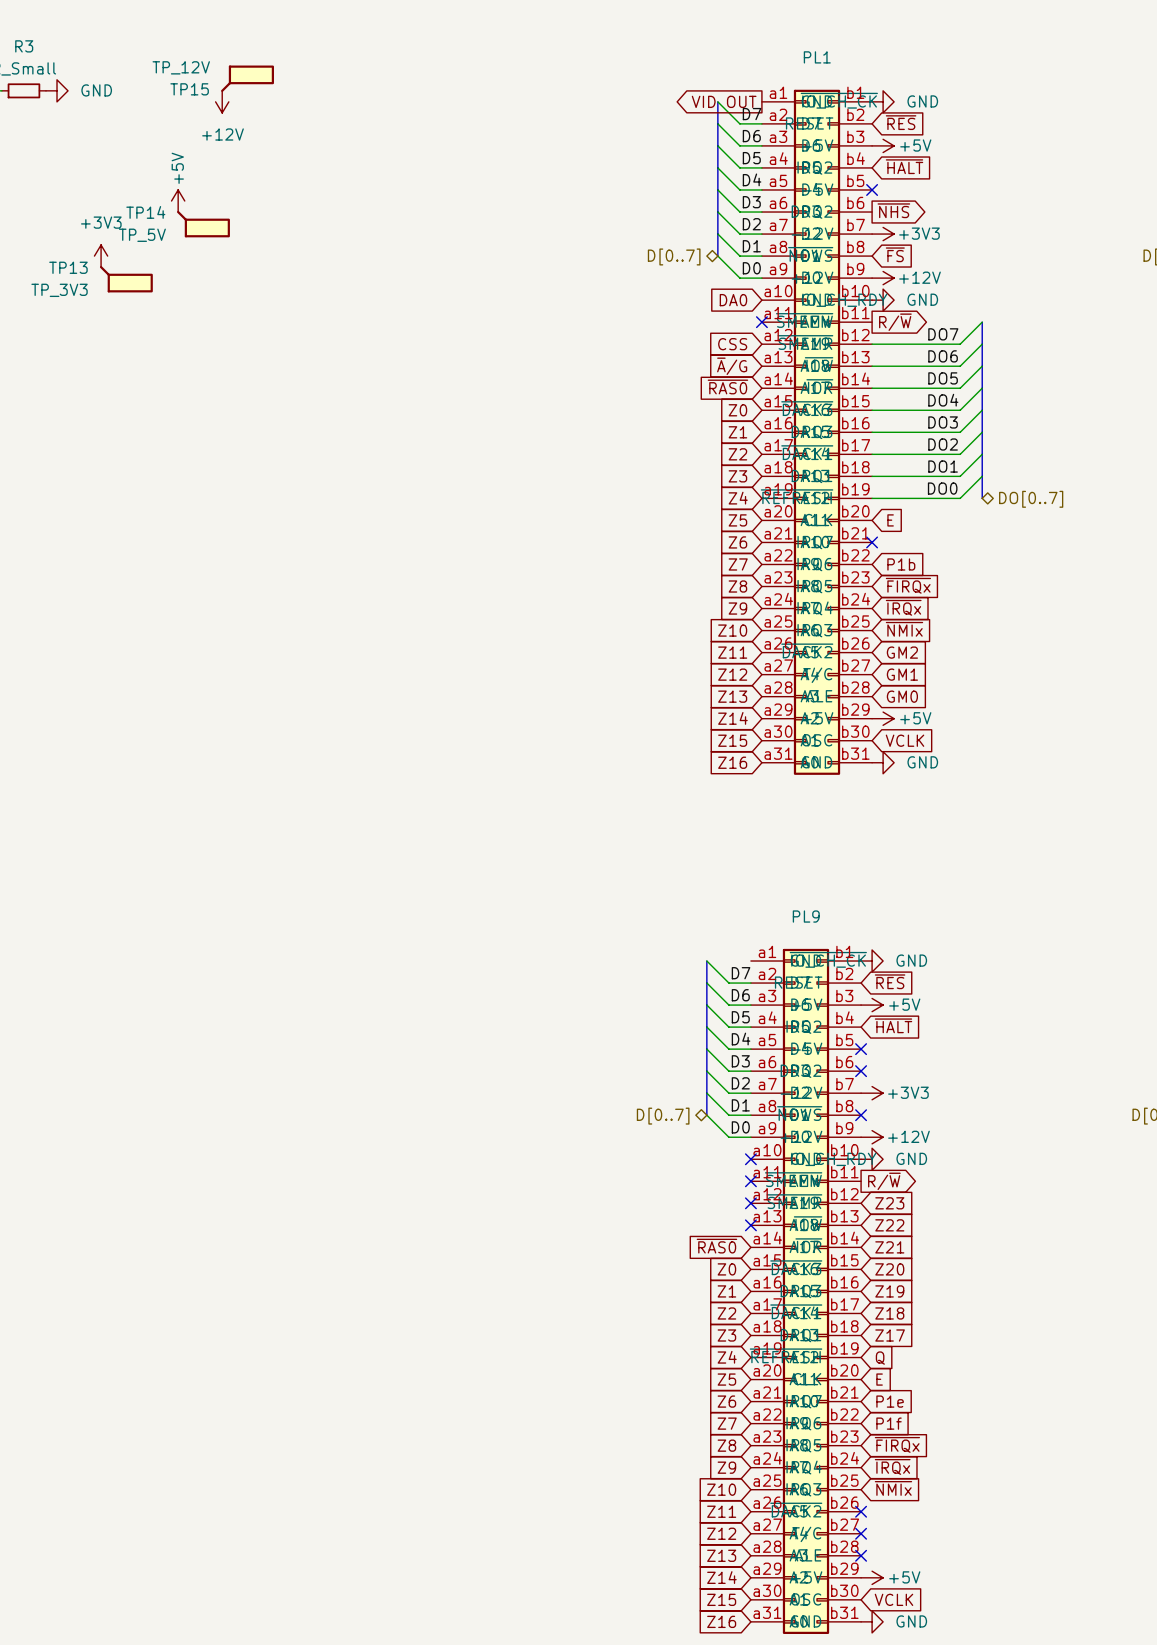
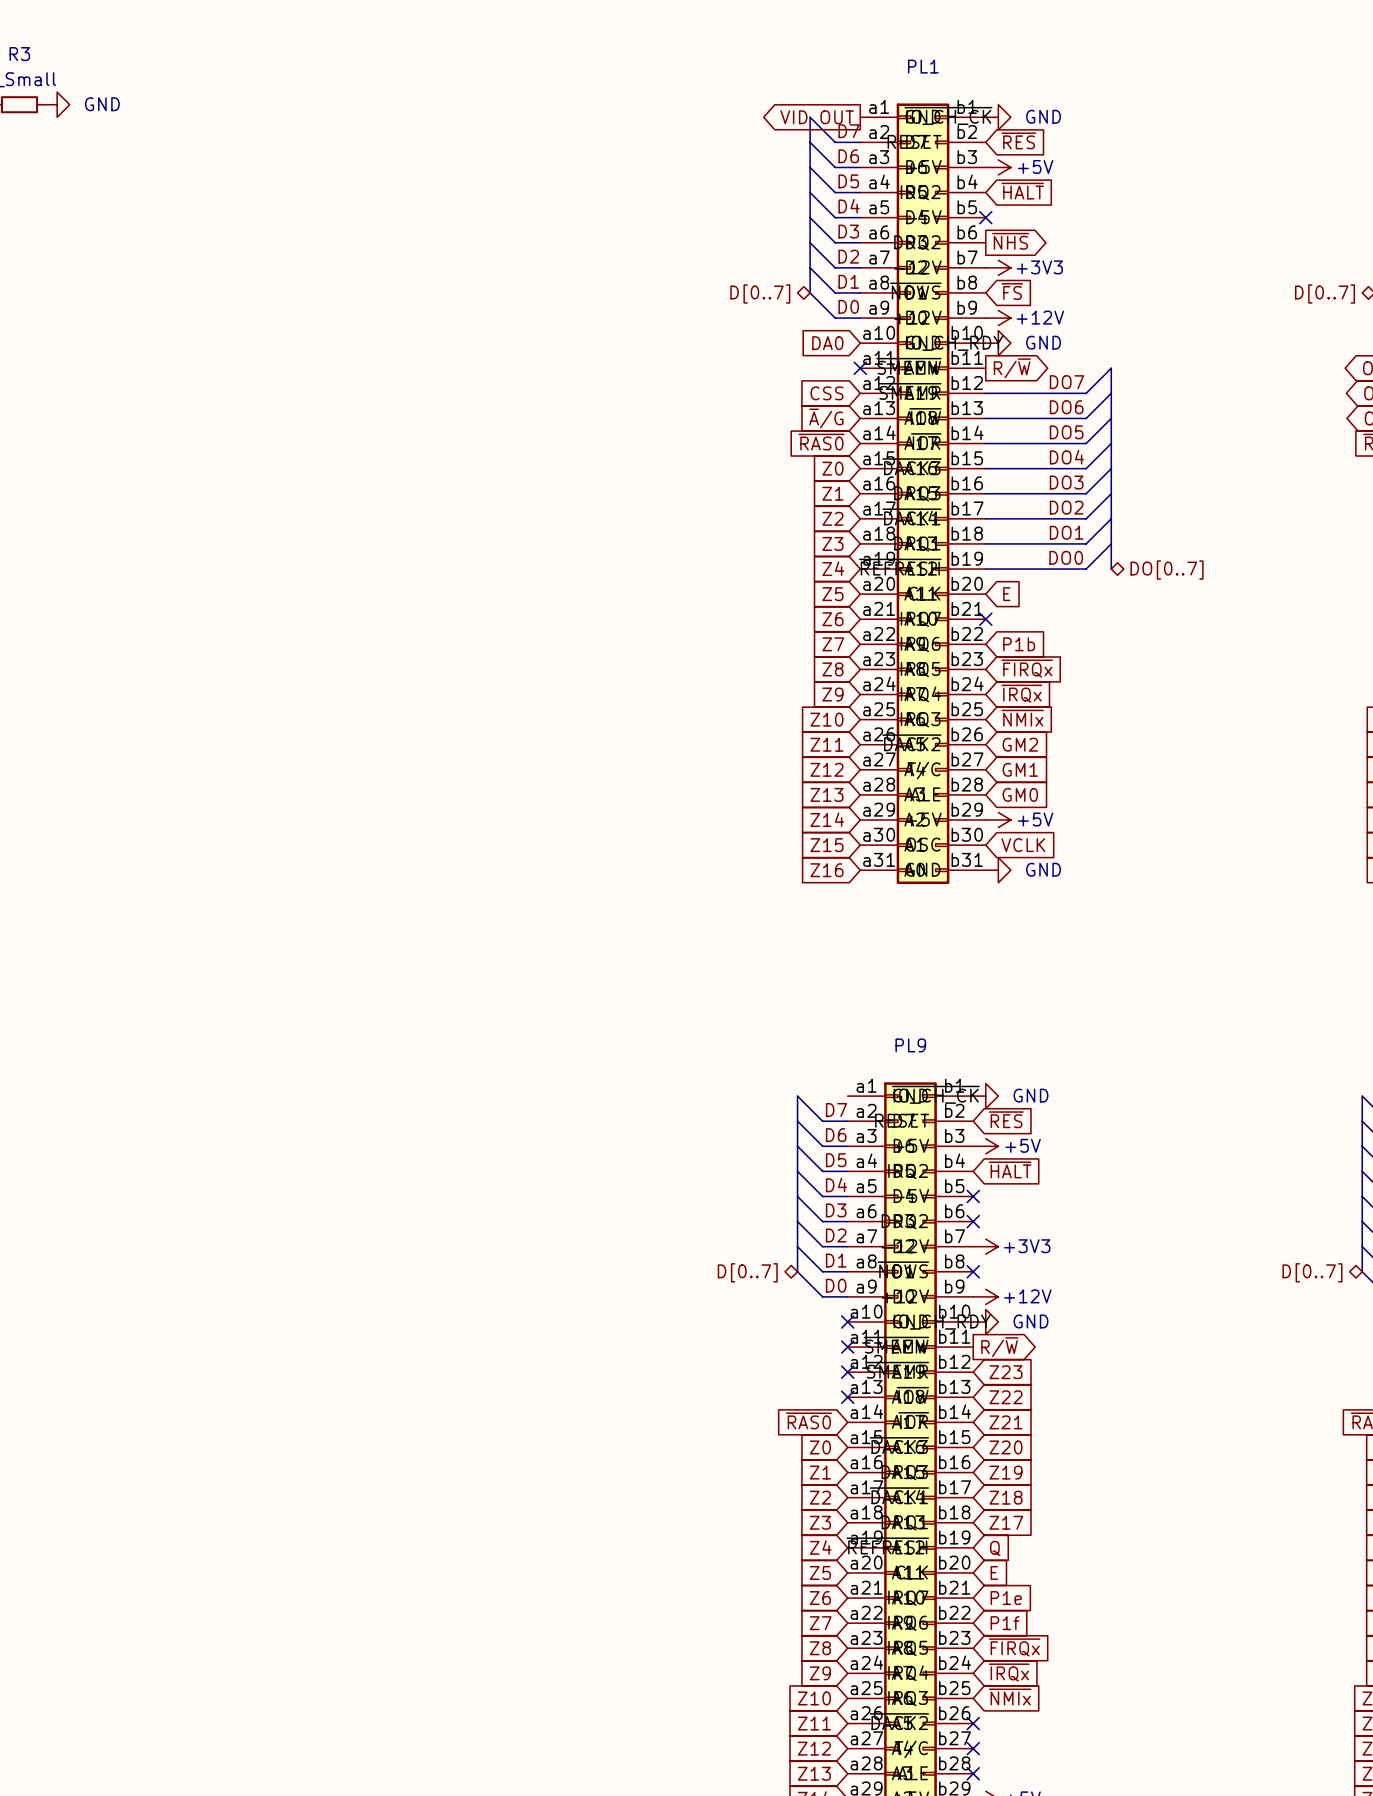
TP15: TP_12V (247, 78) -> none
power symbol: +12V (222, 101) -> none
power symbol: +5V (178, 201) -> none
TP14: TP_5V (203, 224) -> none
power symbol: +3V3 (101, 256) -> none
TP13: TP_3V3 (126, 279) -> none

